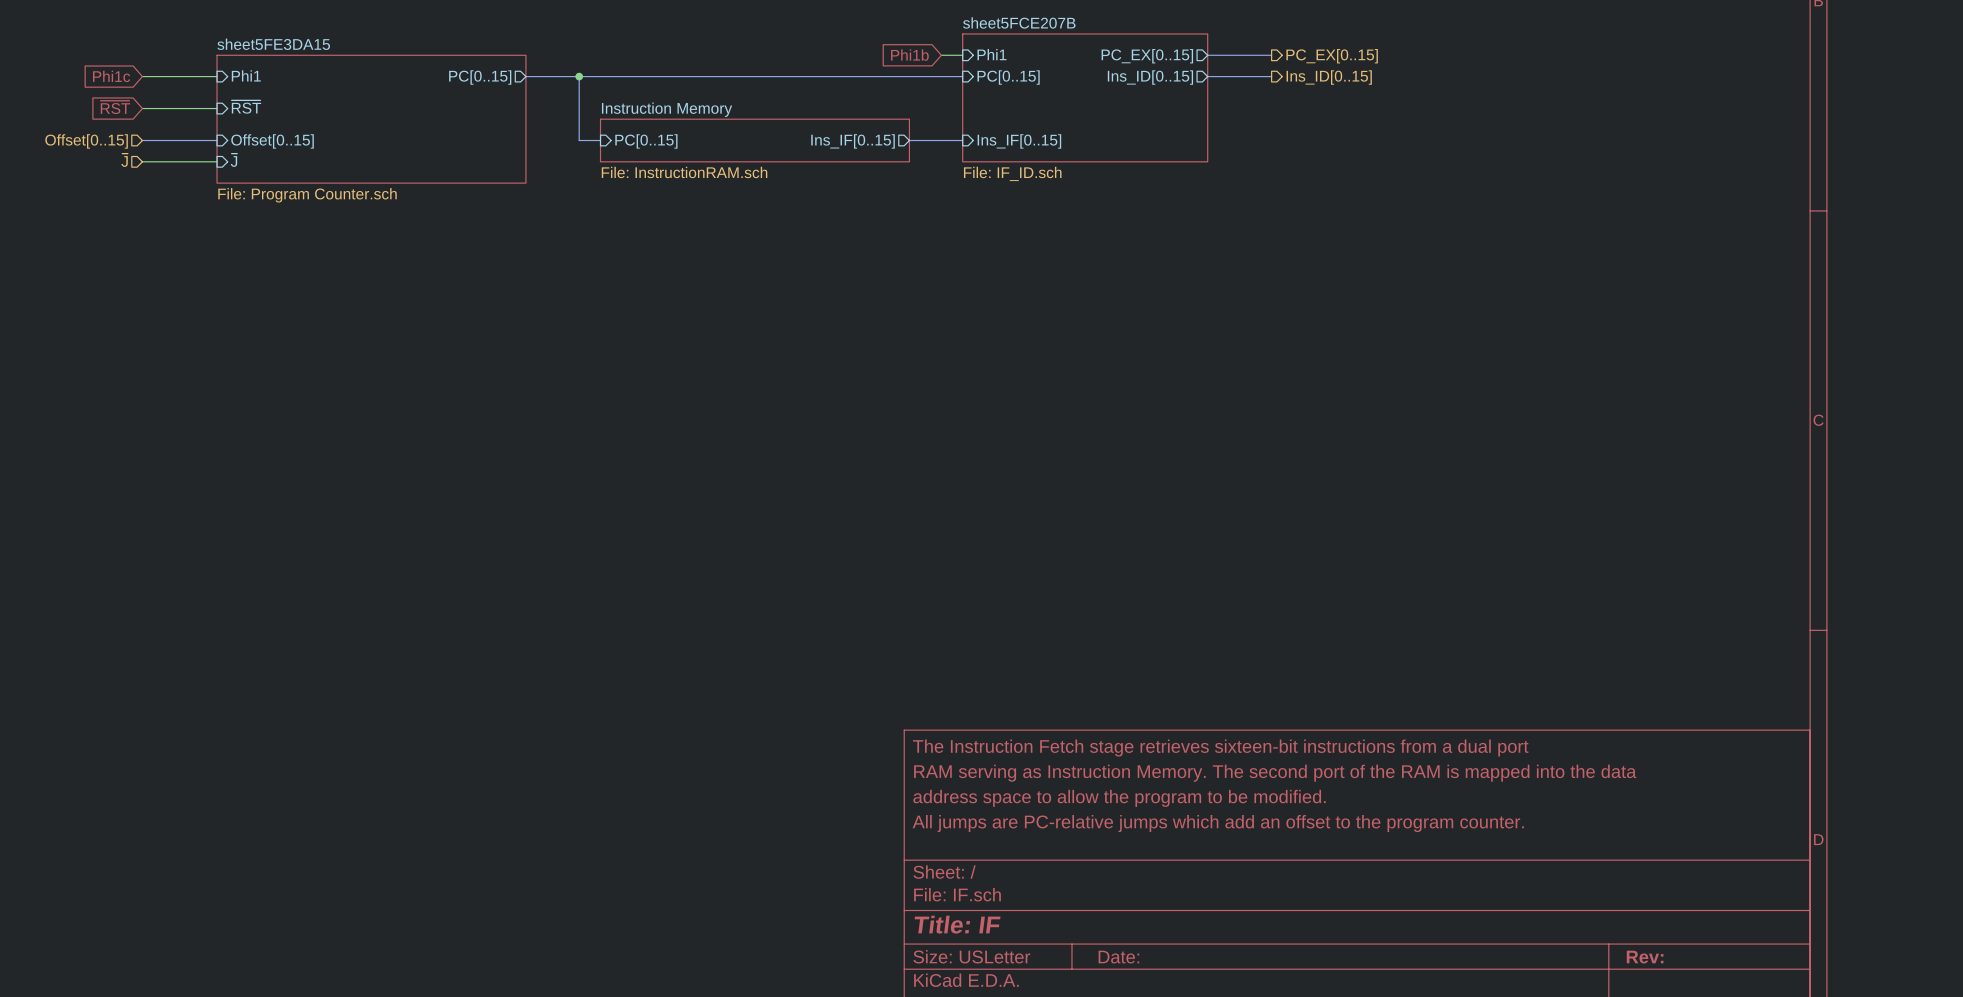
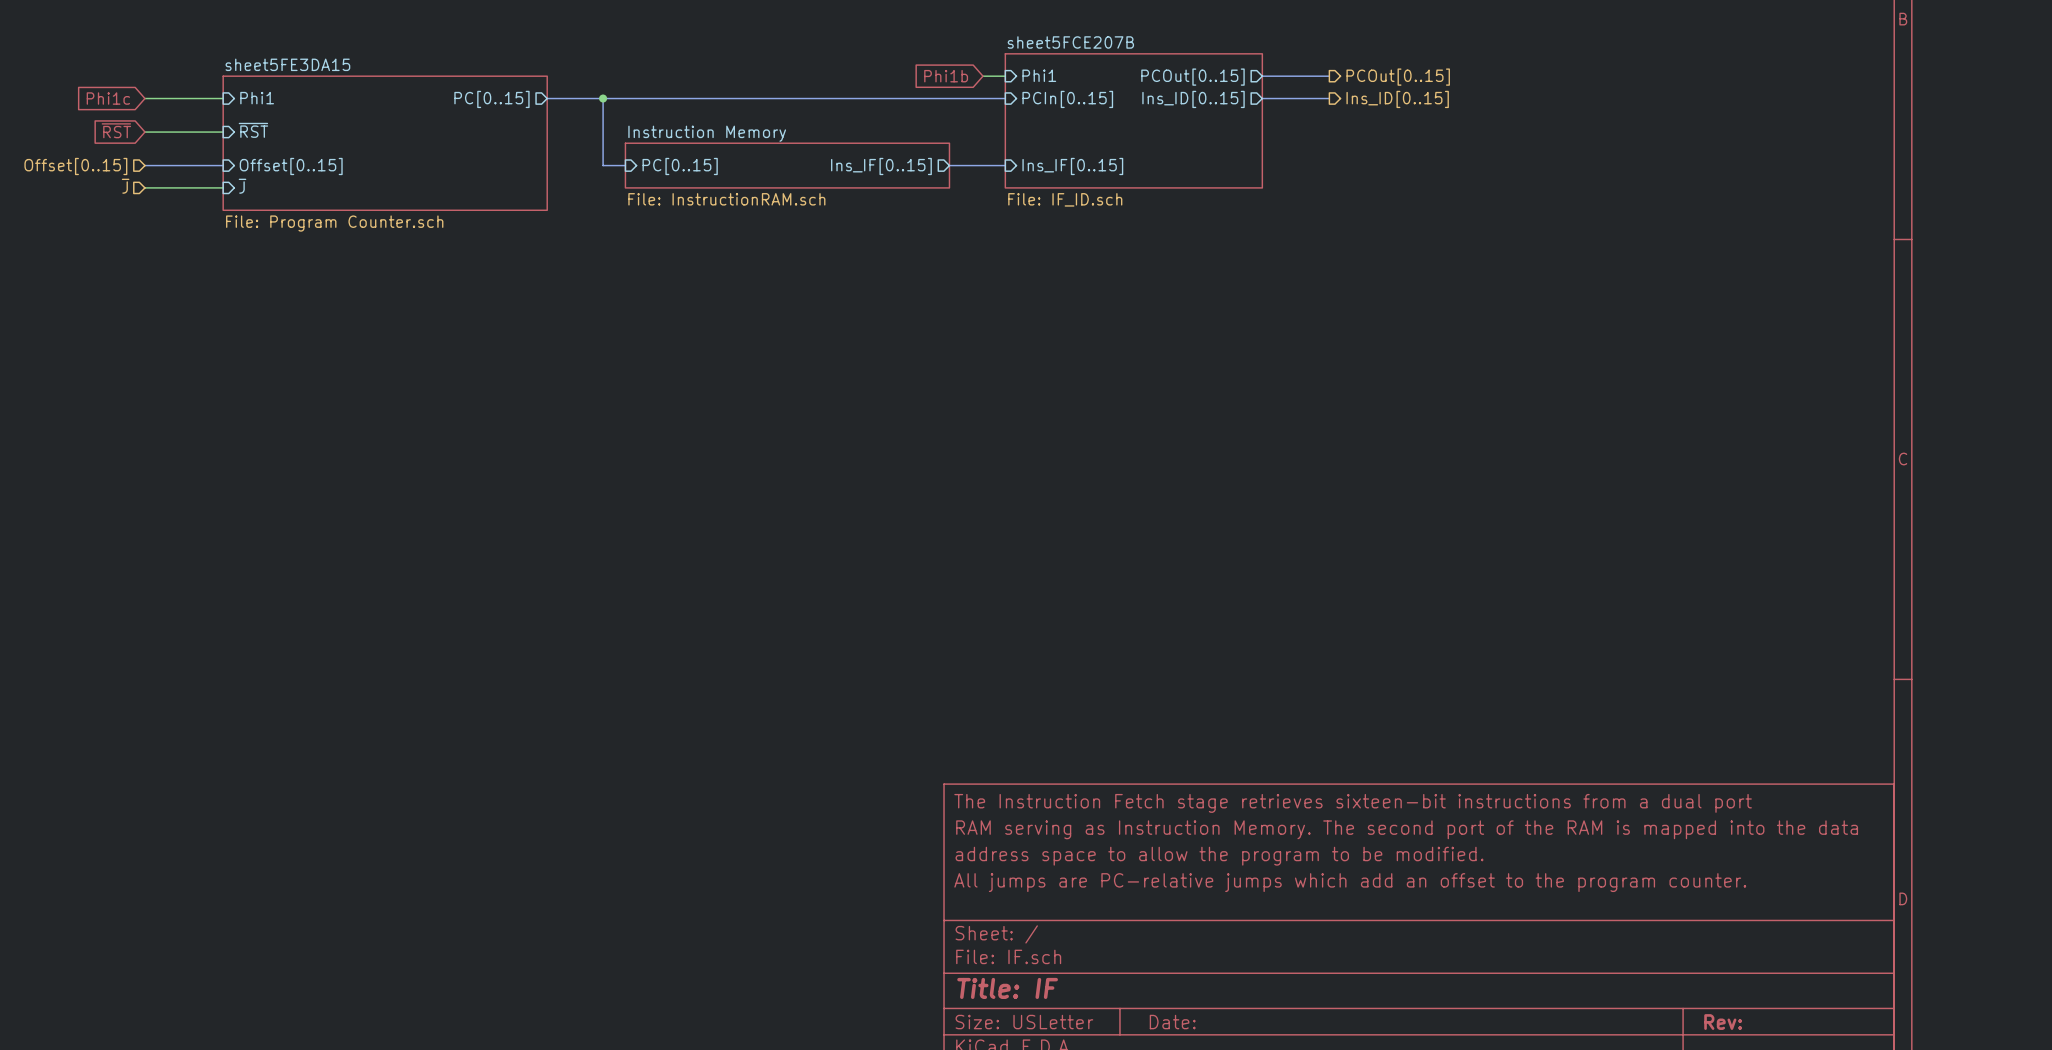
sheet pin: PC_EX[0..15] (1147, 56) -> PCOut[0..15] (1192, 77)
hierarchical label: PC_EX[0..15] (1332, 56) -> PCOut[0..15] (1398, 77)
sheet pin: PC[0..15] (1008, 77) -> PCIn[0..15] (1067, 99)

